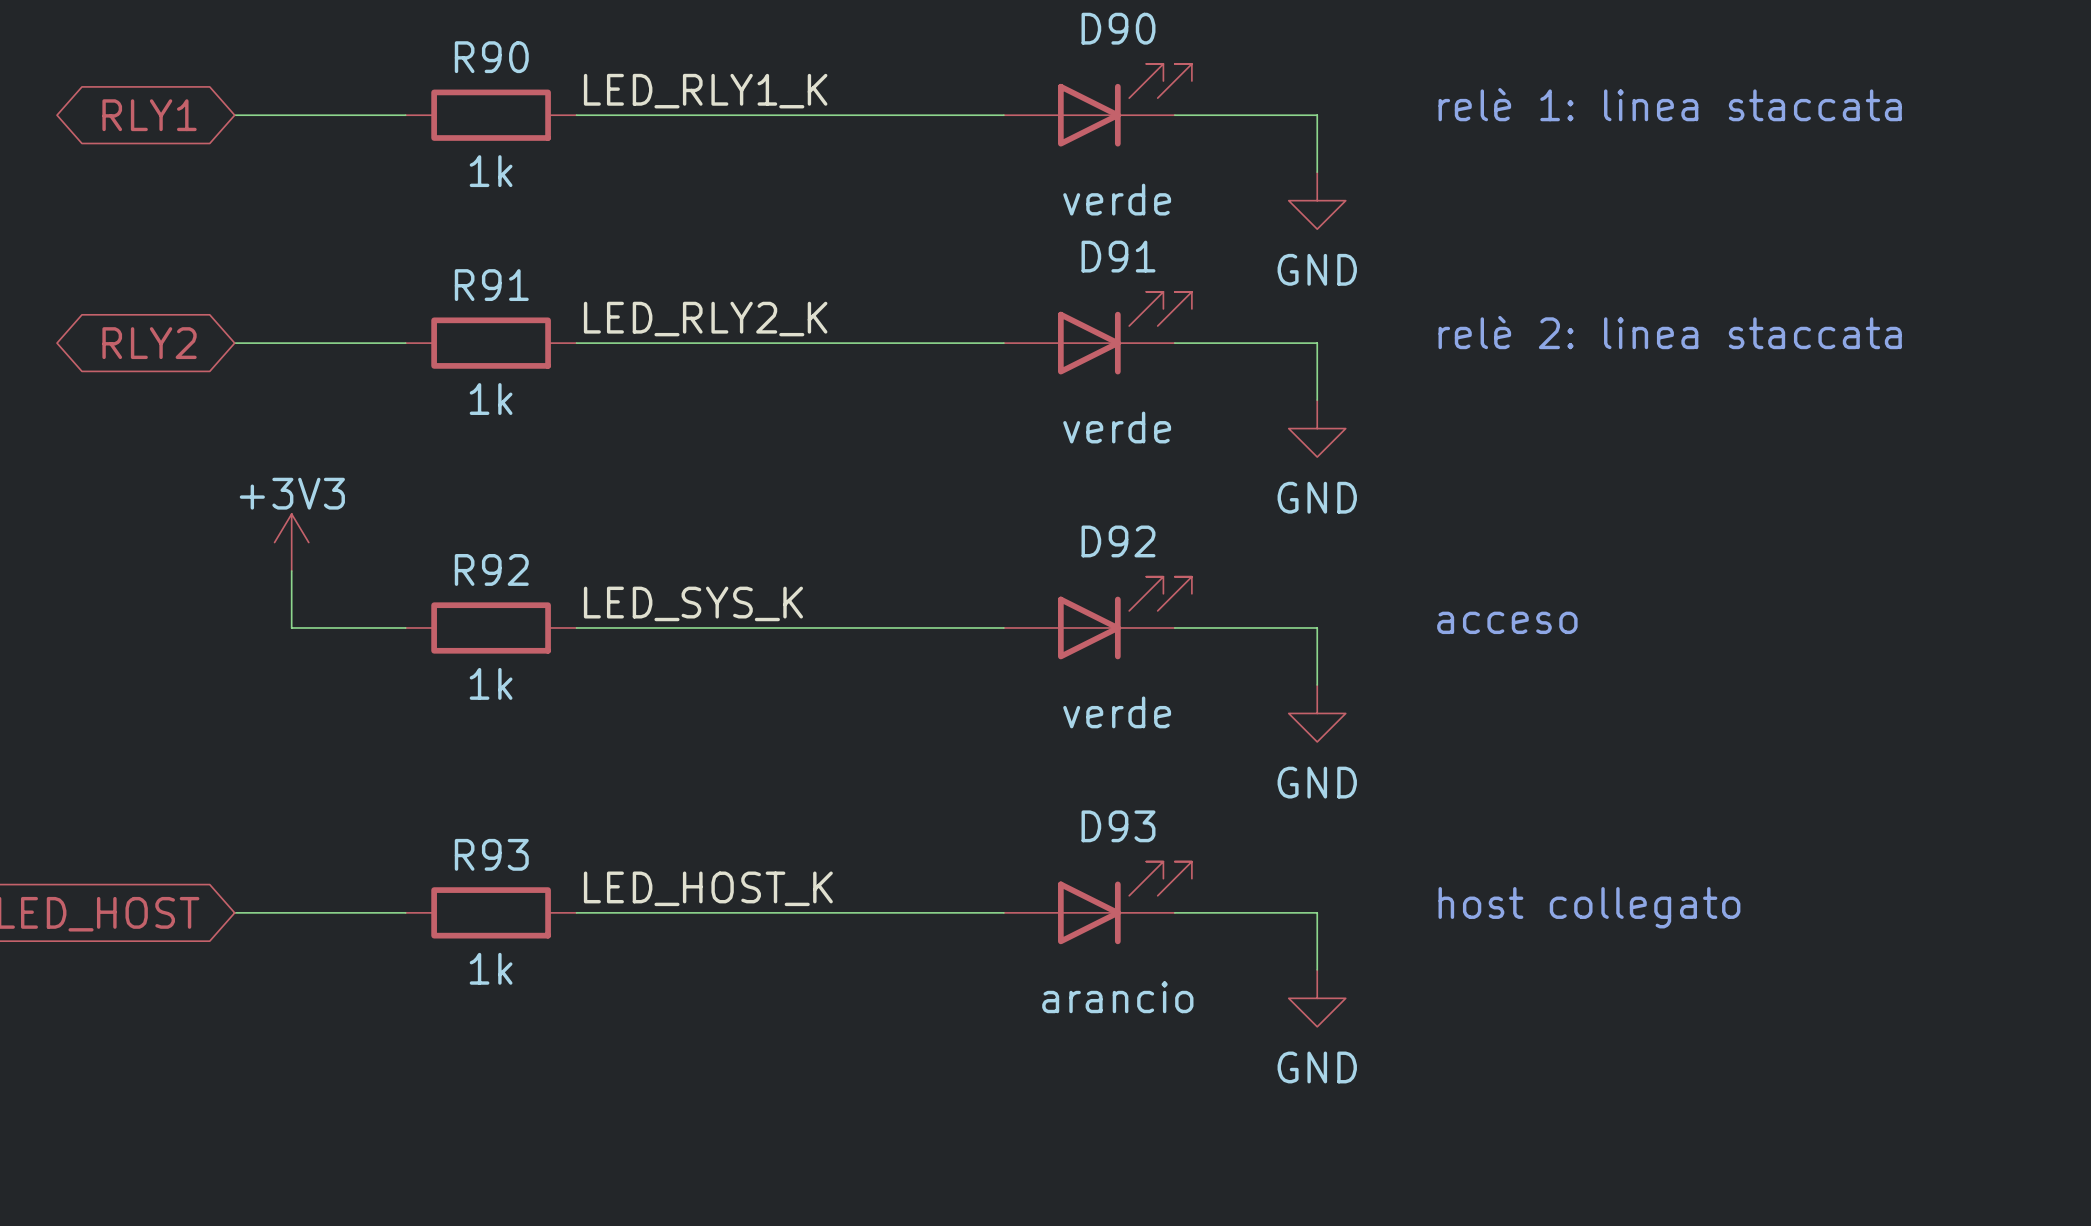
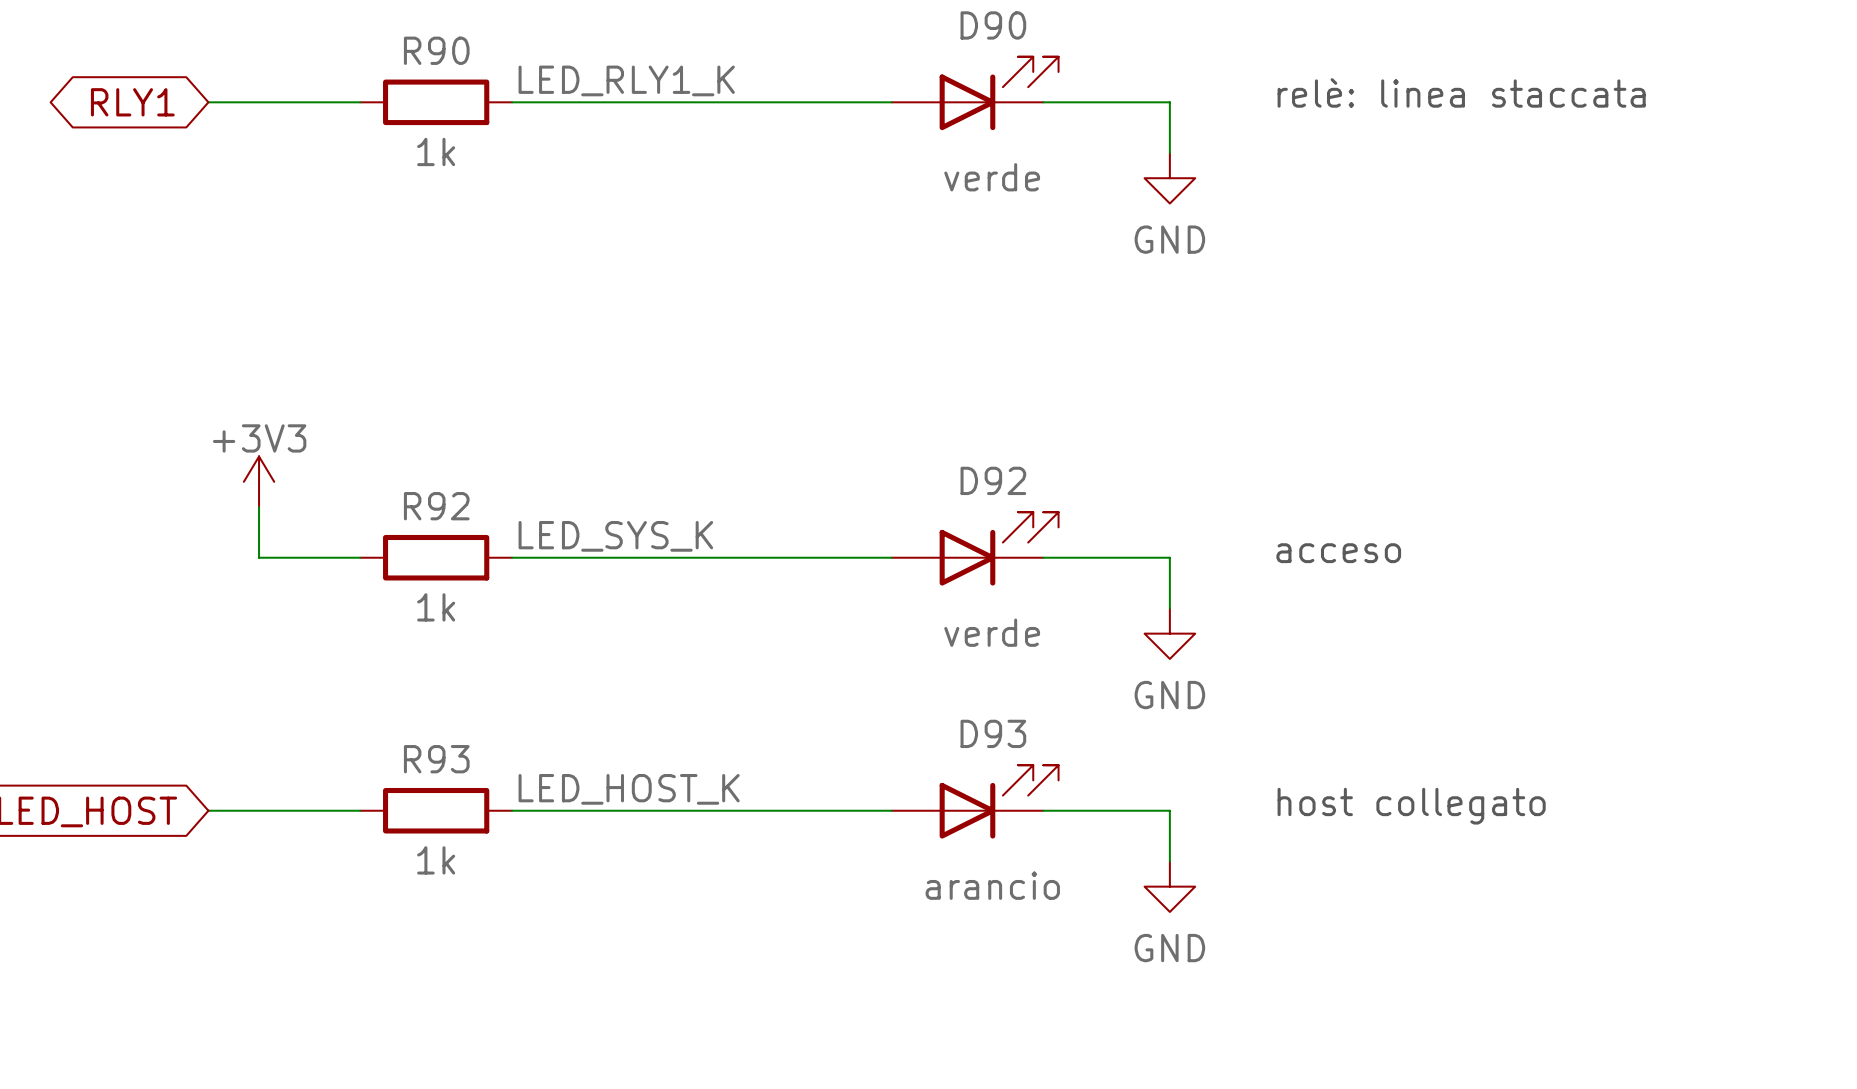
text: relè 1: linea staccata (1670, 104) -> relè: linea staccata (1461, 92)
label: LED_RLY2_K (705, 319) -> none
text: relè 2: linea staccata (1670, 332) -> none
D91: verde (1097, 333) -> none
global label: RLY2 (149, 343) -> none
wire: (234, 343) (405, 343) -> none
R91: 1k (491, 343) -> none
wire: (576, 343) (1003, 343) -> none
wire: (1174, 343) (1317, 343) (1317, 400) -> none
power symbol: GND (1317, 428) -> none

